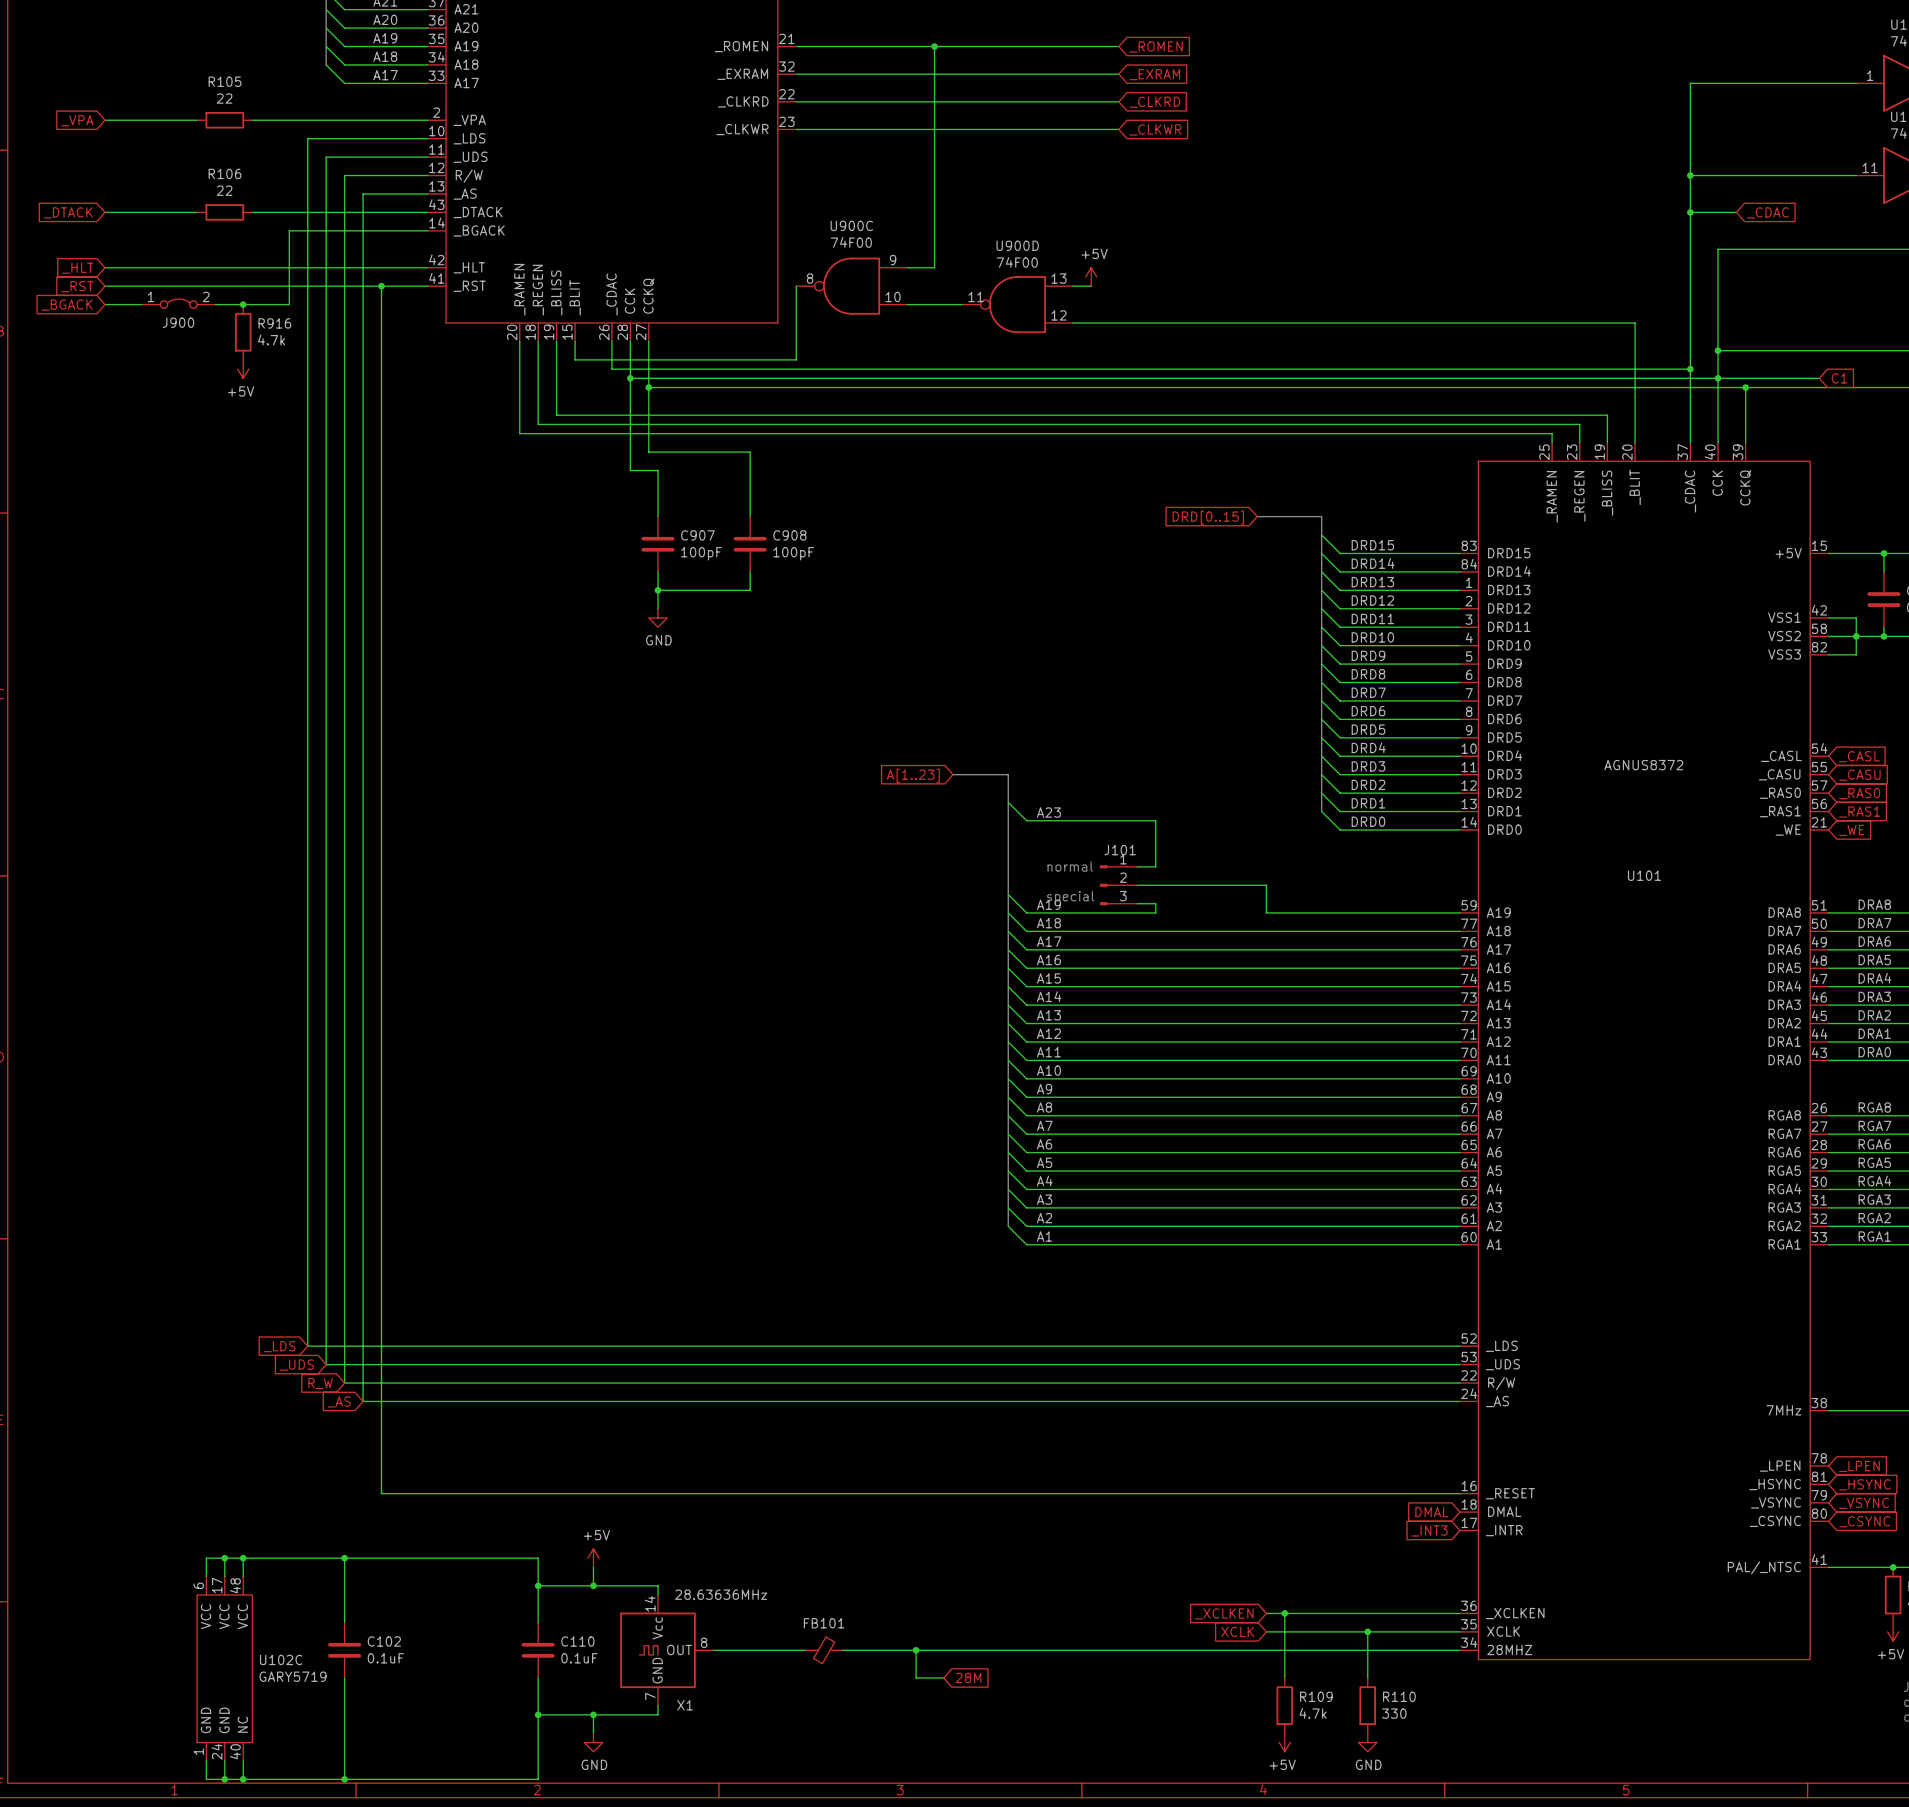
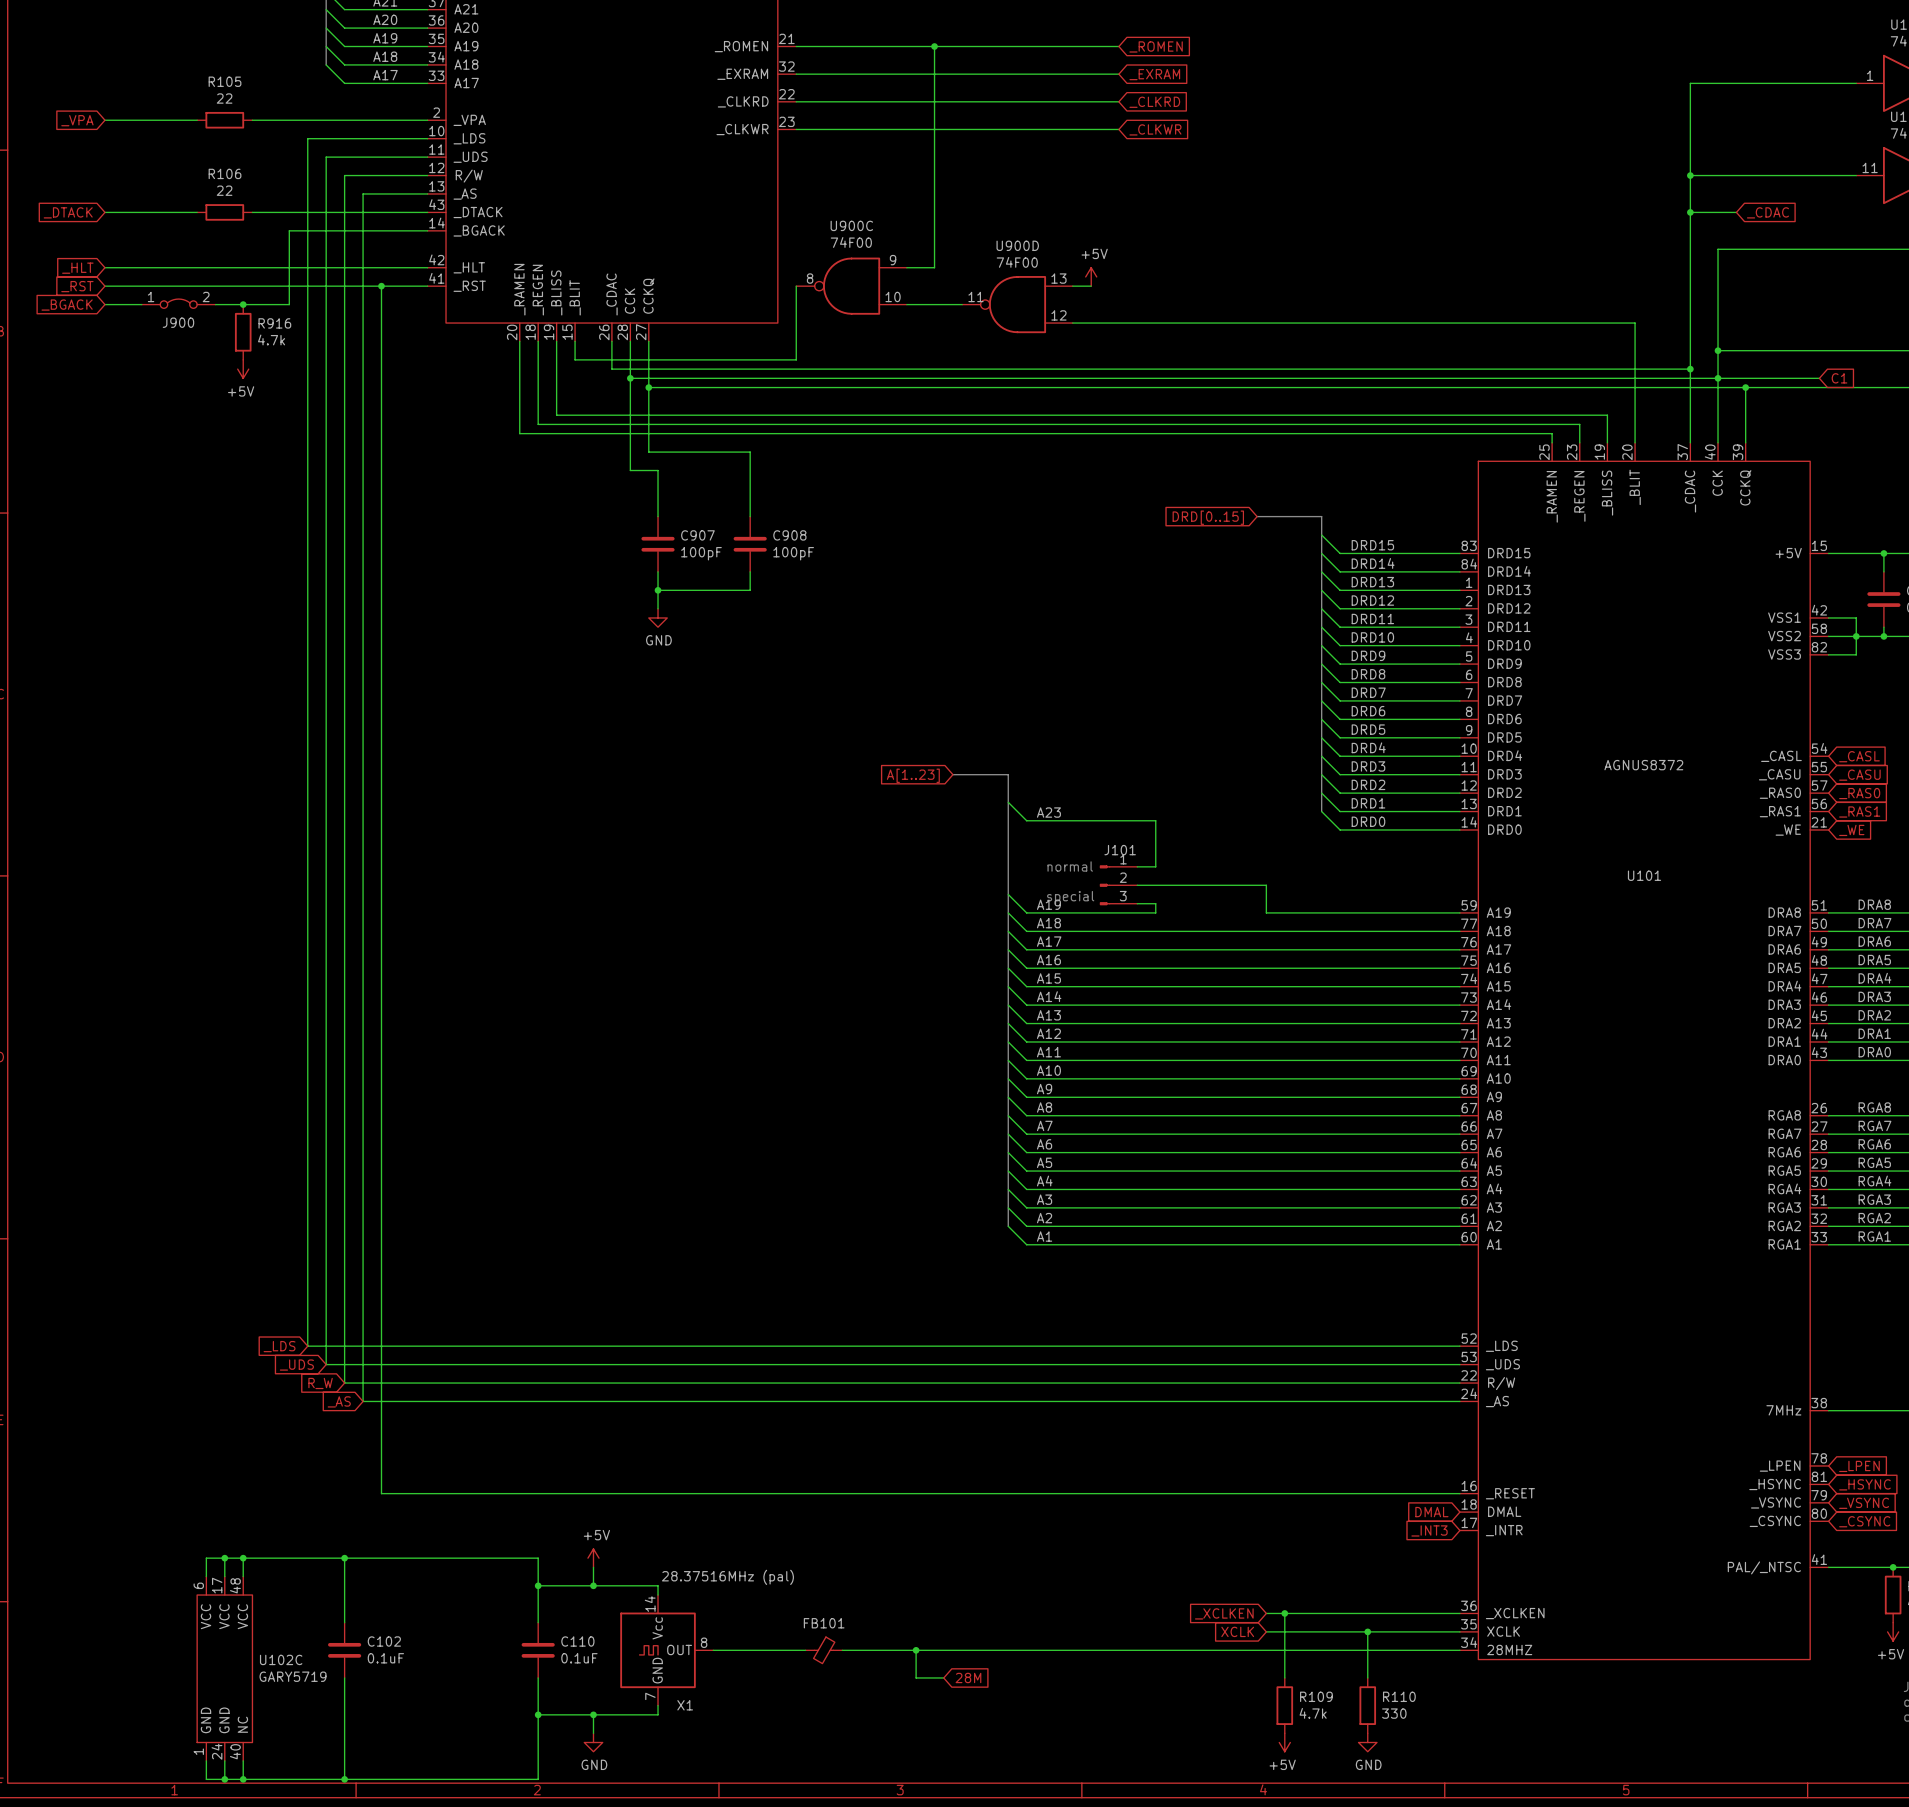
X1 value: 28.63636MHz (721, 1594) -> 28.37516MHz (pal) (727, 1577)

